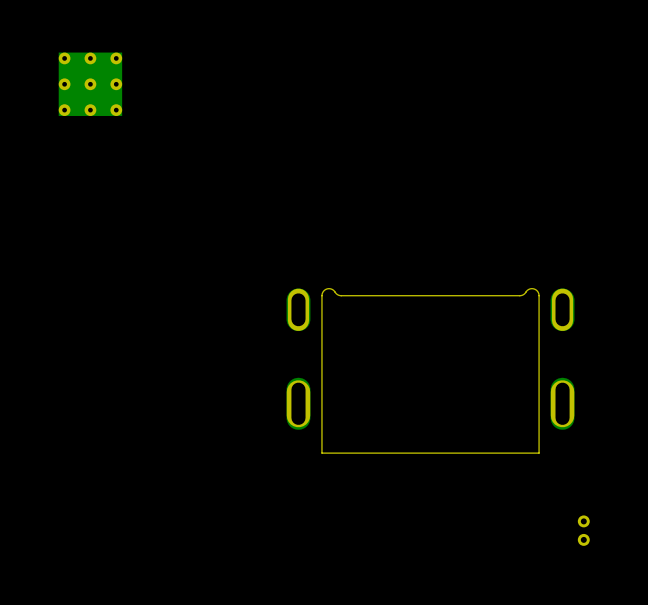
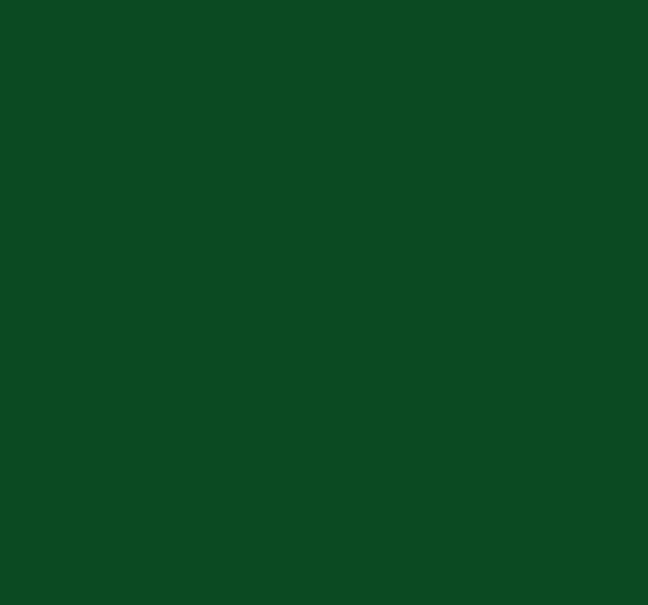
part: (90, 84) -> none
part: (430, 370) -> none
part: (583, 530) -> none

